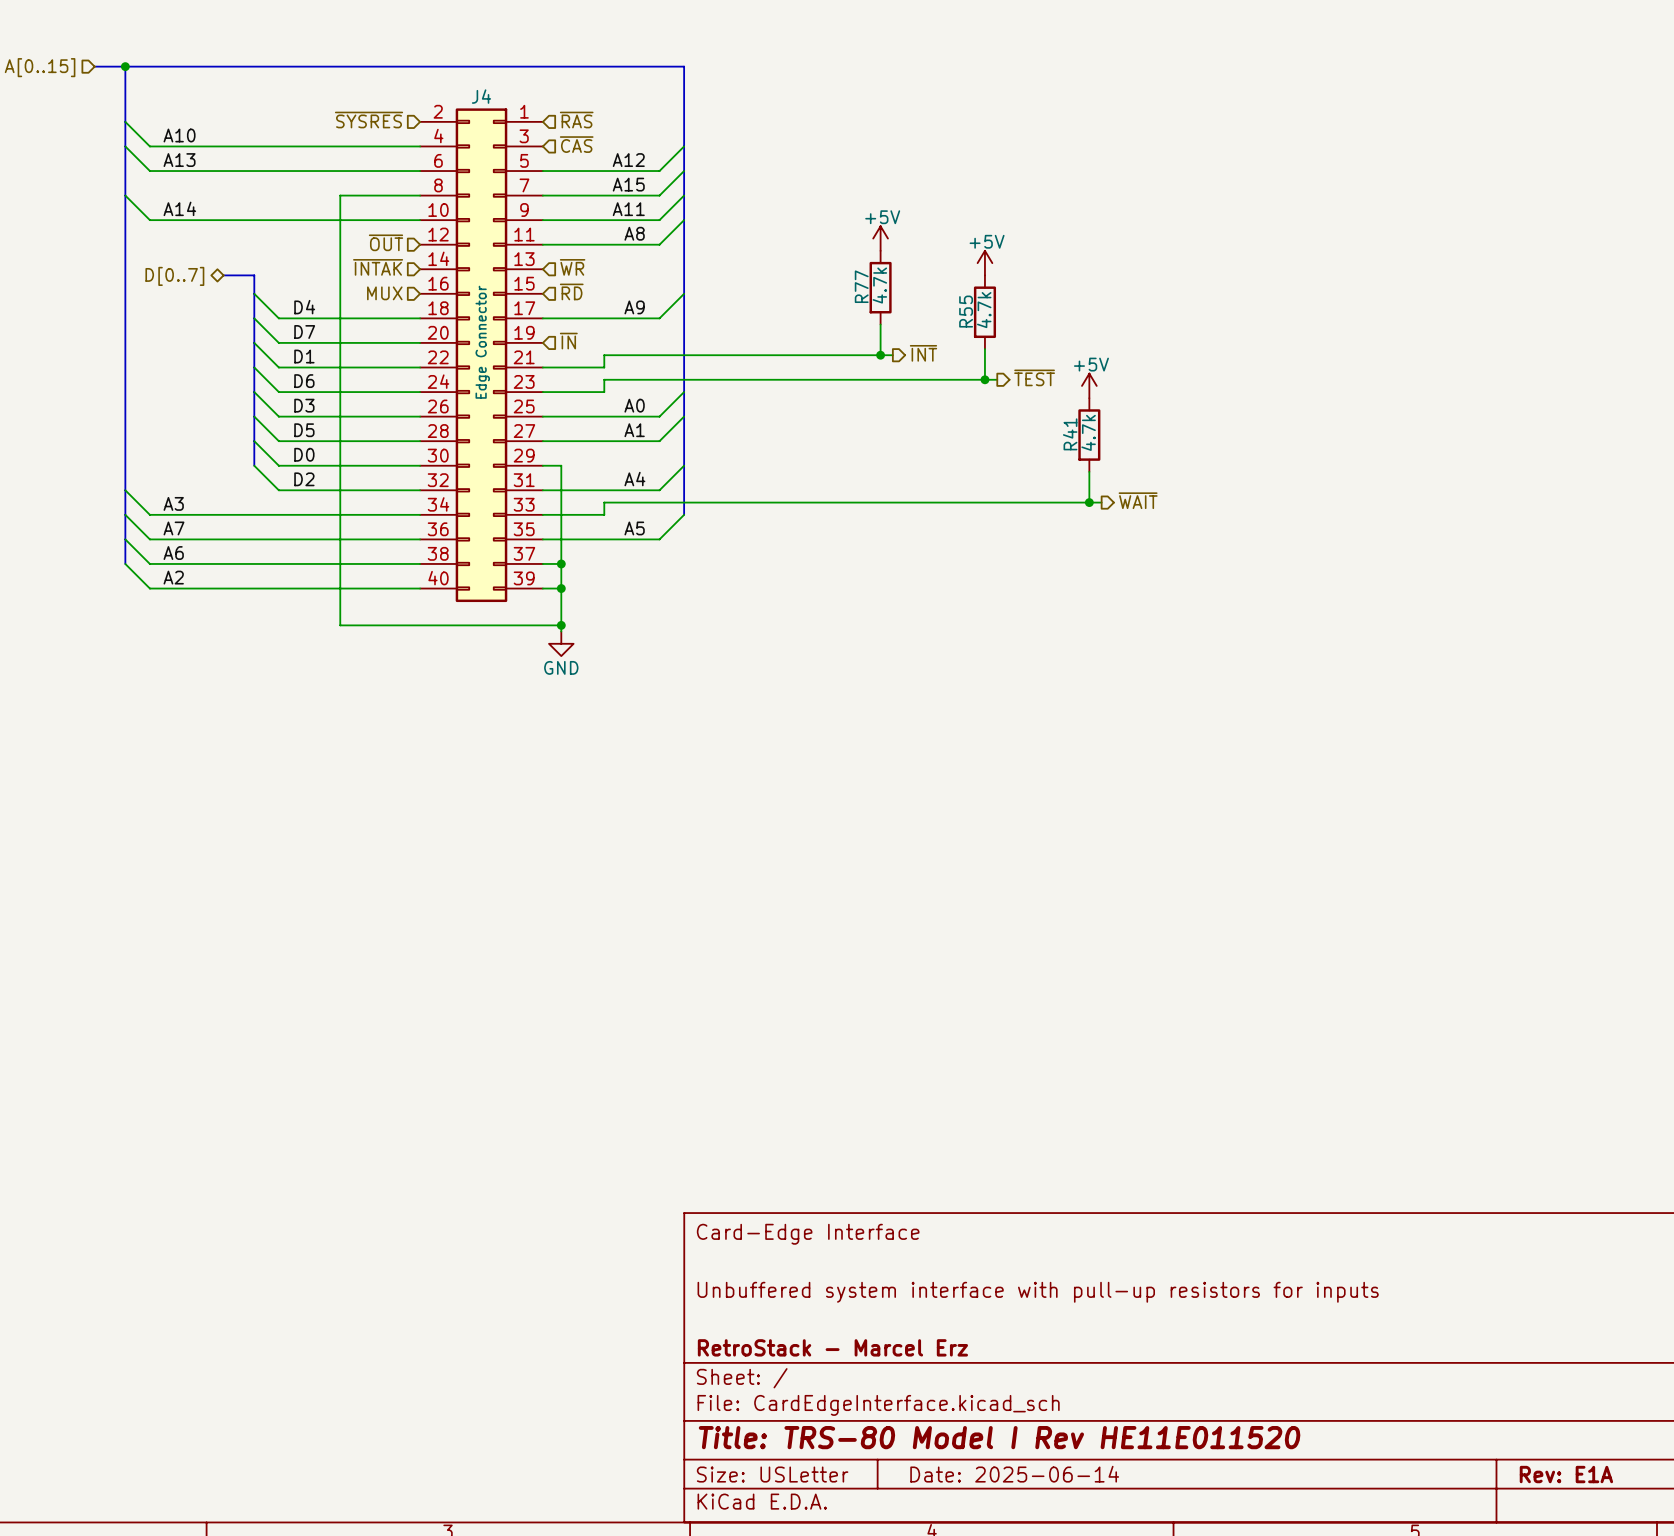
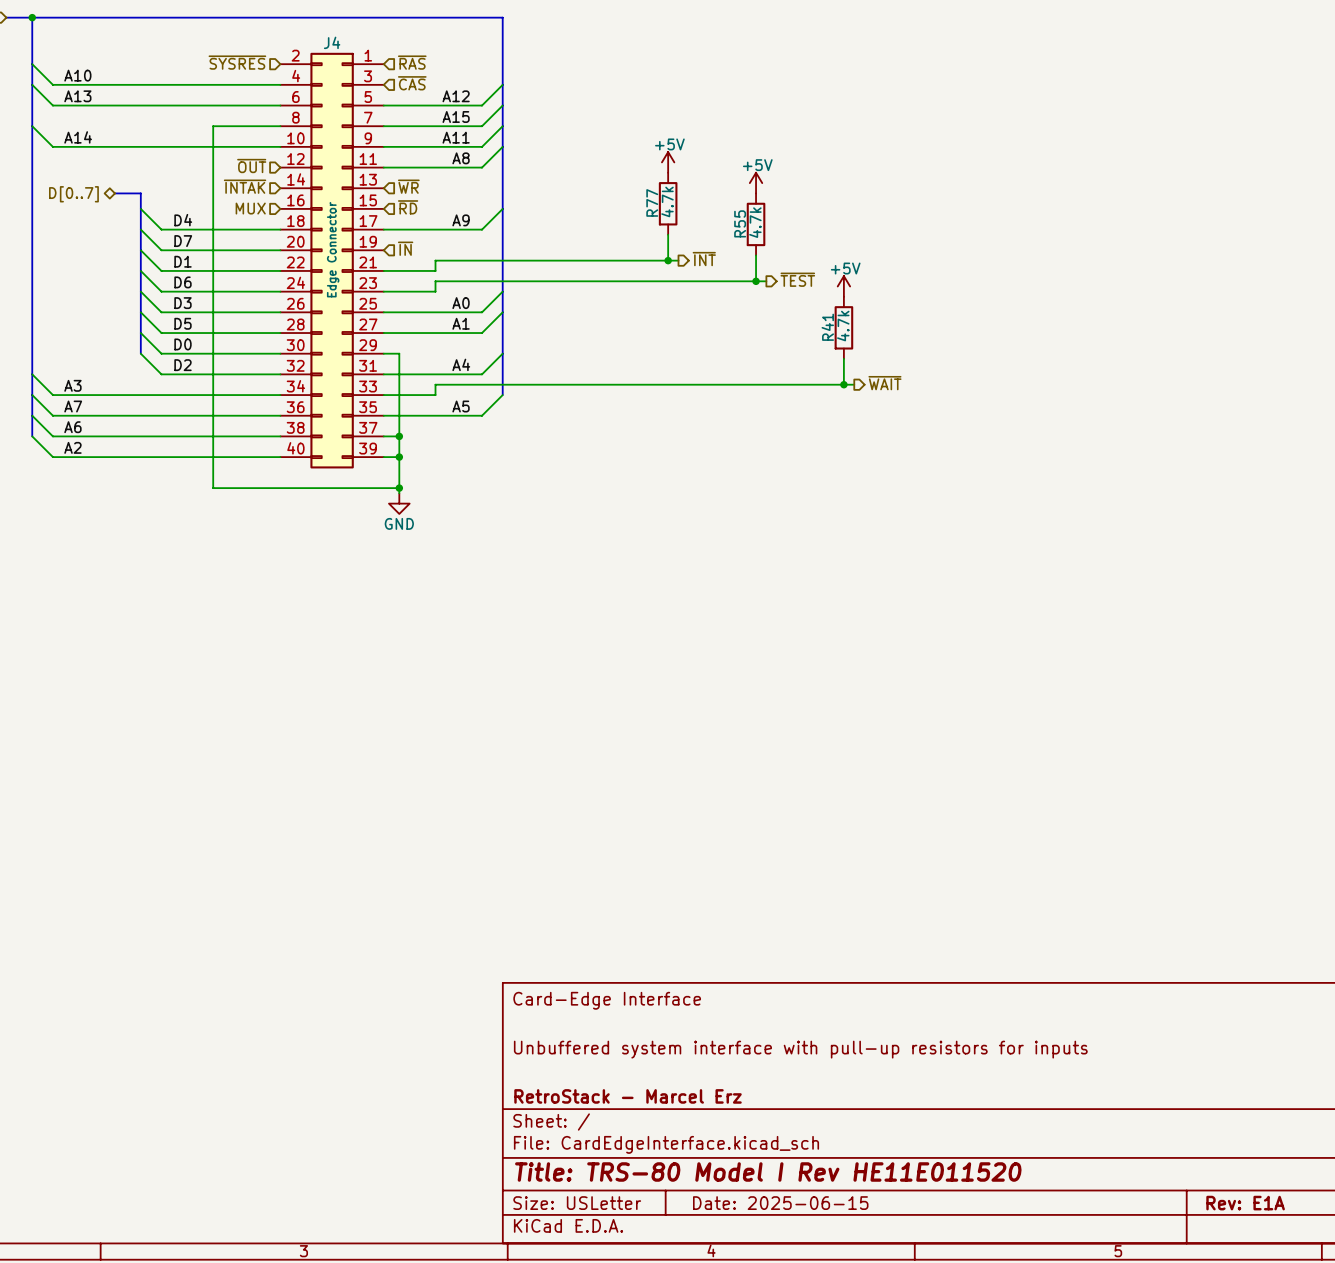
title block: Date: 2025-06-14 (1014, 1474) -> Date: 2025-06-15 (780, 1203)

